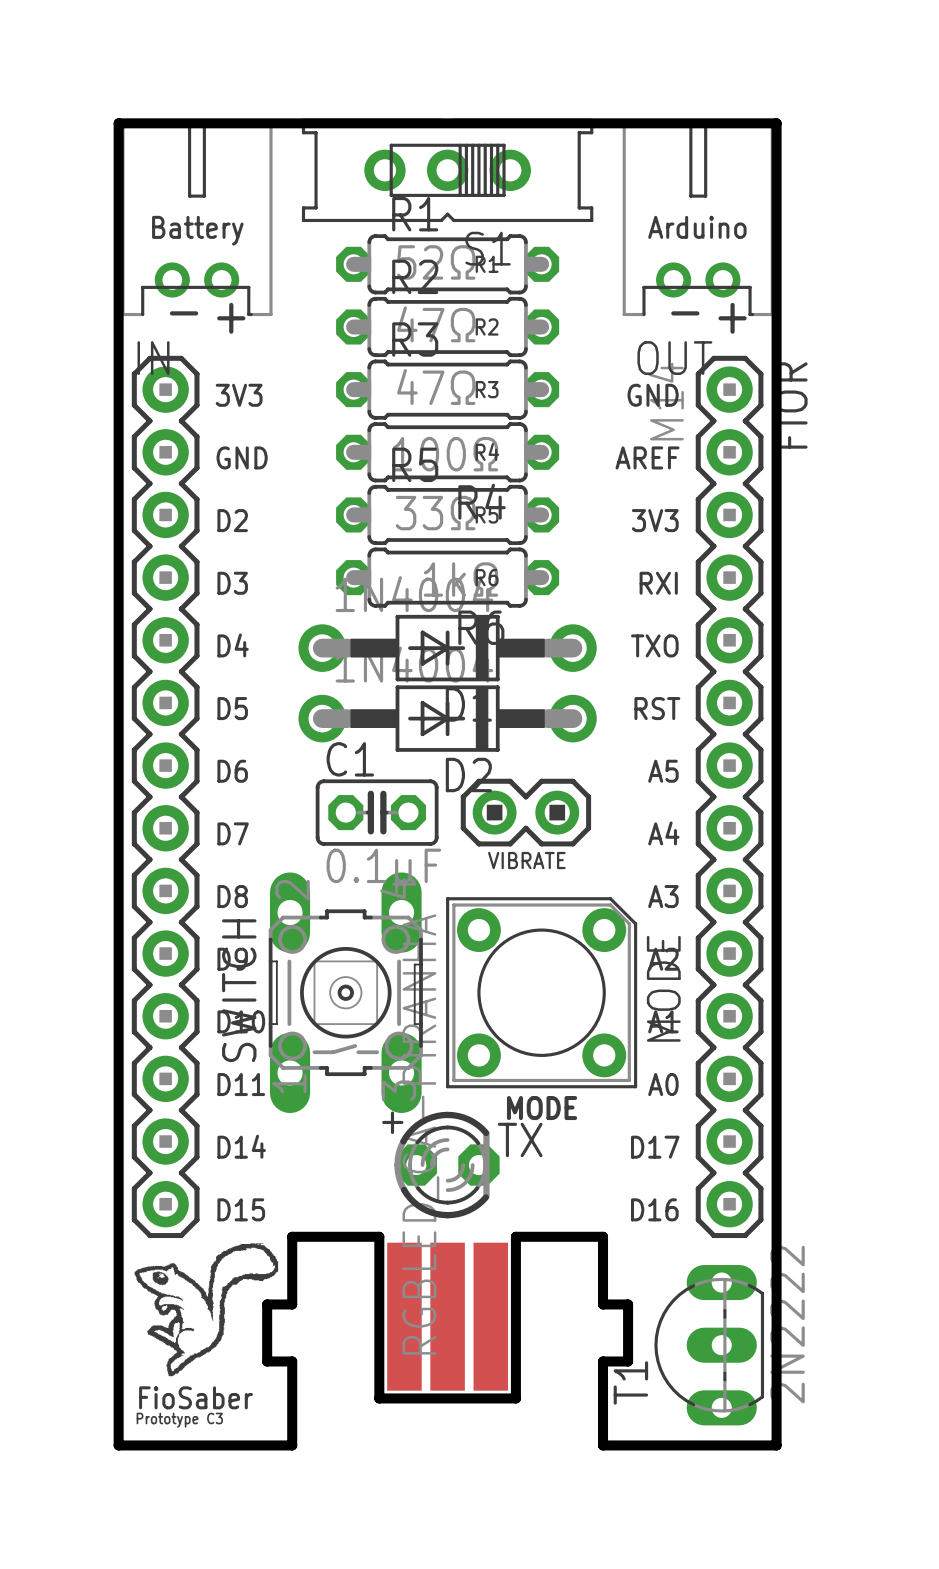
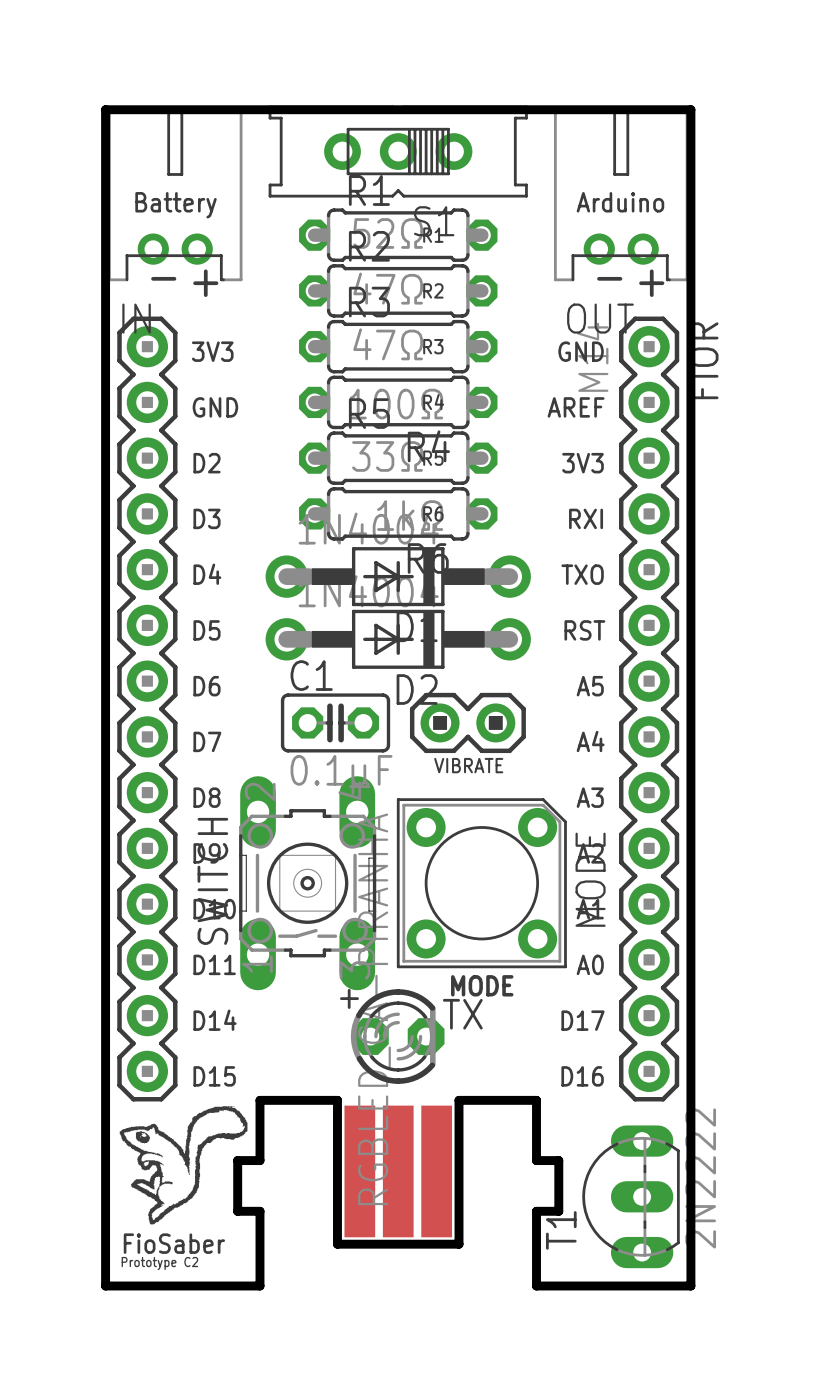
text: Prototype C3 (179, 1420) -> Prototype C2 (159, 1263)

